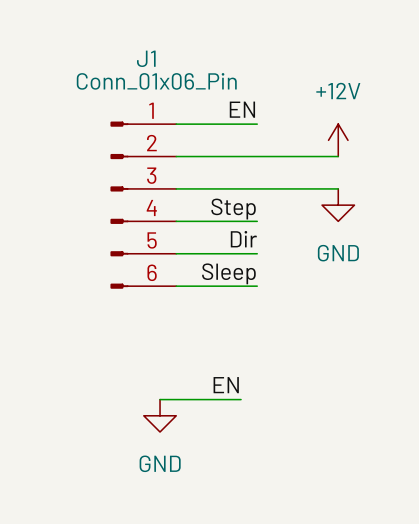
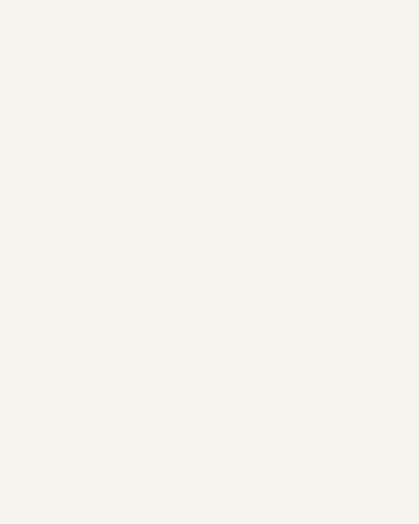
label: EN (242, 109) -> none
wire: (176, 124) (257, 124) -> none
power symbol: +12V (338, 140) -> none
wire: (176, 156) (338, 156) -> none
wire: (176, 188) (338, 188) -> none
J1: Conn_01x06_Pin (143, 205) -> none
power symbol: GND (338, 205) -> none
label: Step (233, 209) -> none
wire: (176, 221) (257, 221) -> none
label: Dir (243, 239) -> none
wire: (176, 253) (257, 253) -> none
label: Sleep (228, 273) -> none
wire: (176, 286) (257, 286) -> none
label: EN (226, 385) -> none
wire: (160, 399) (241, 399) -> none
power symbol: GND (160, 415) -> none

